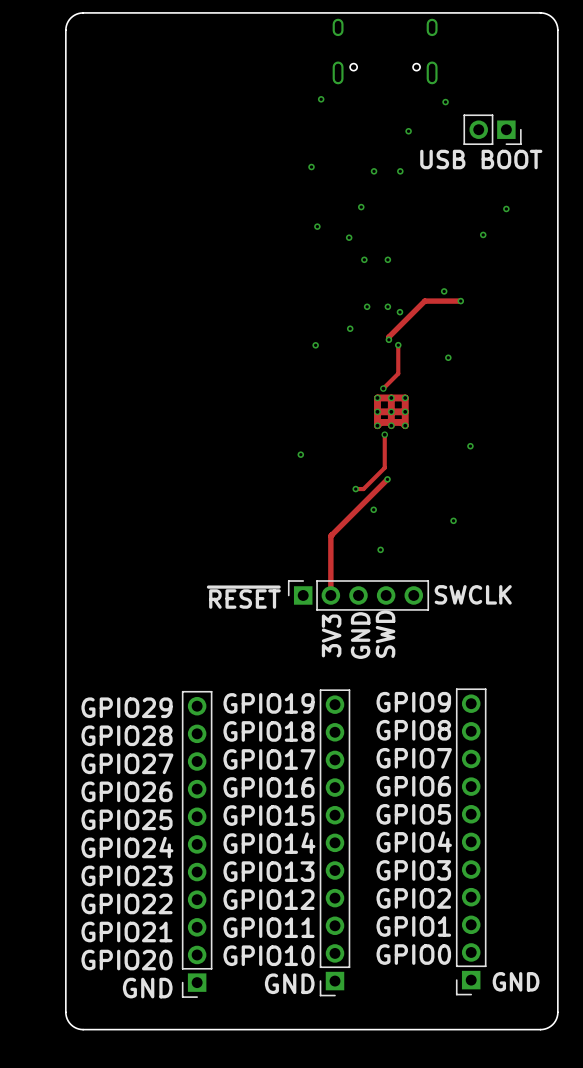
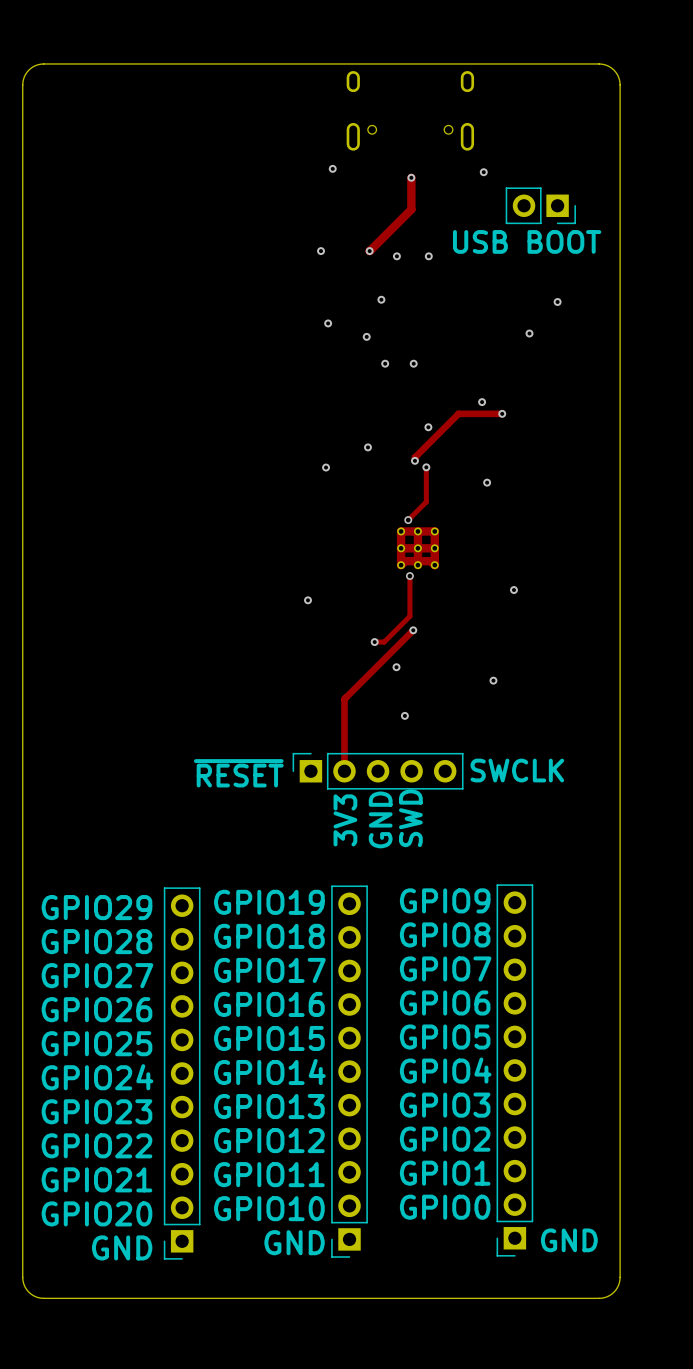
track: none -> (411, 177) (411, 209) (369, 251)
via position: (408, 131) -> (411, 177)
via: none -> (369, 251)
via: (367, 306) -> none
via: (387, 306) -> none

